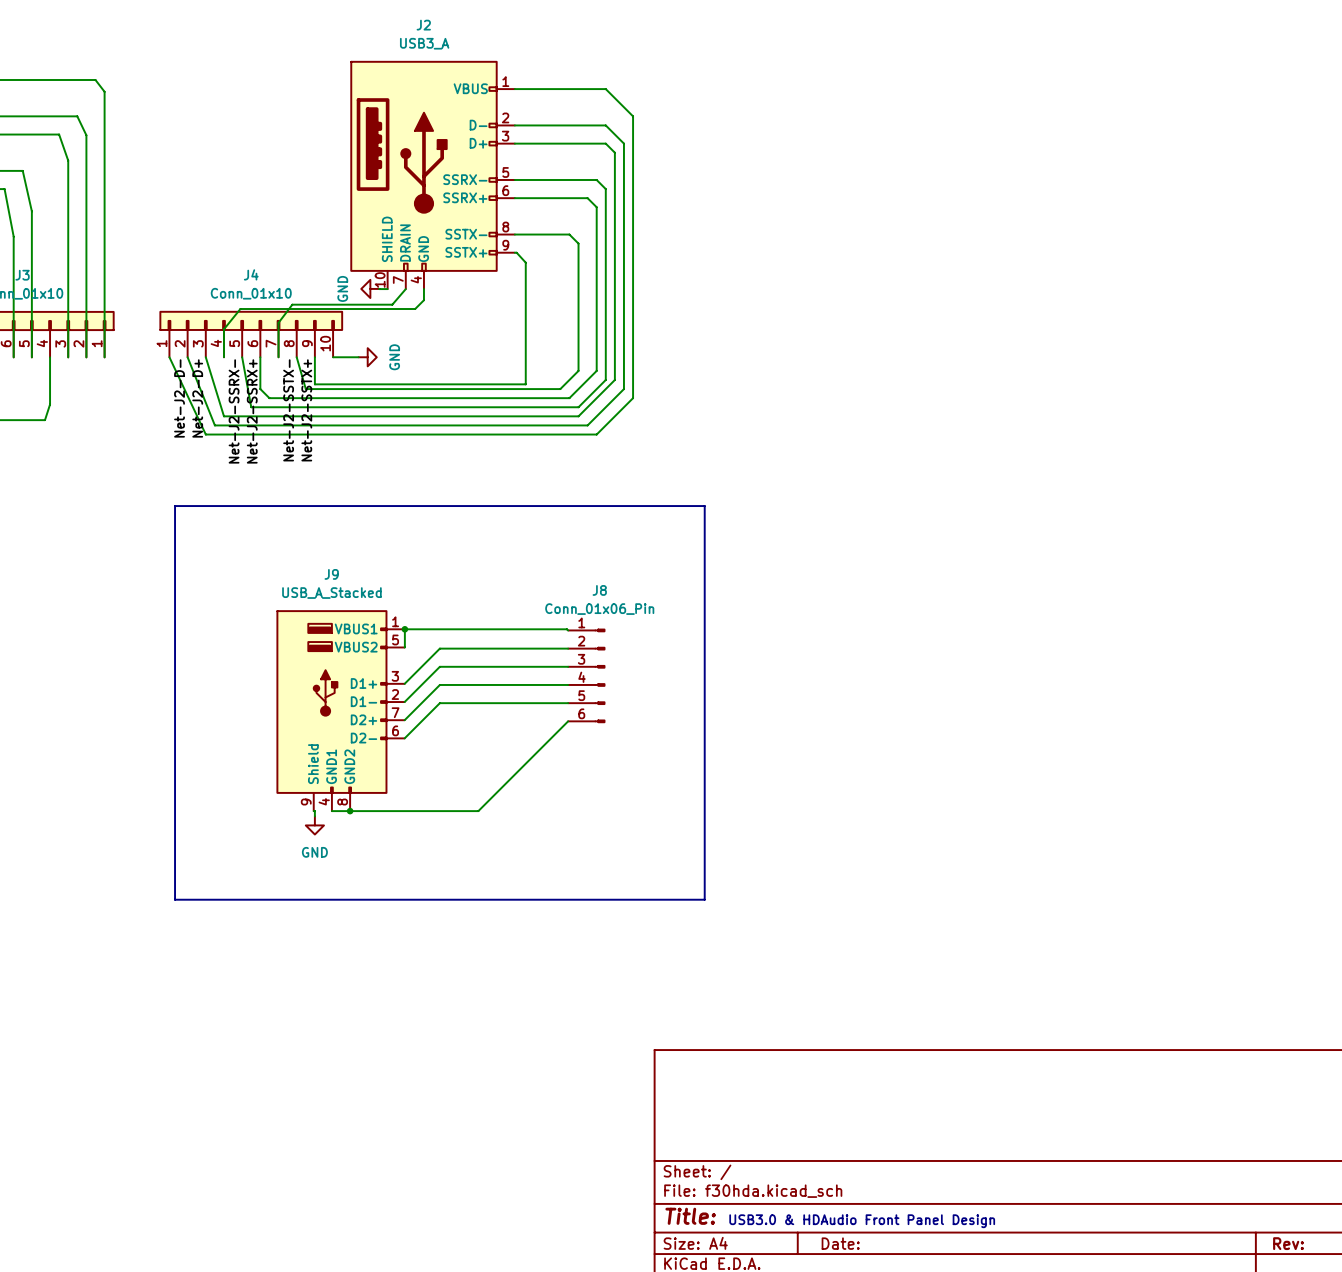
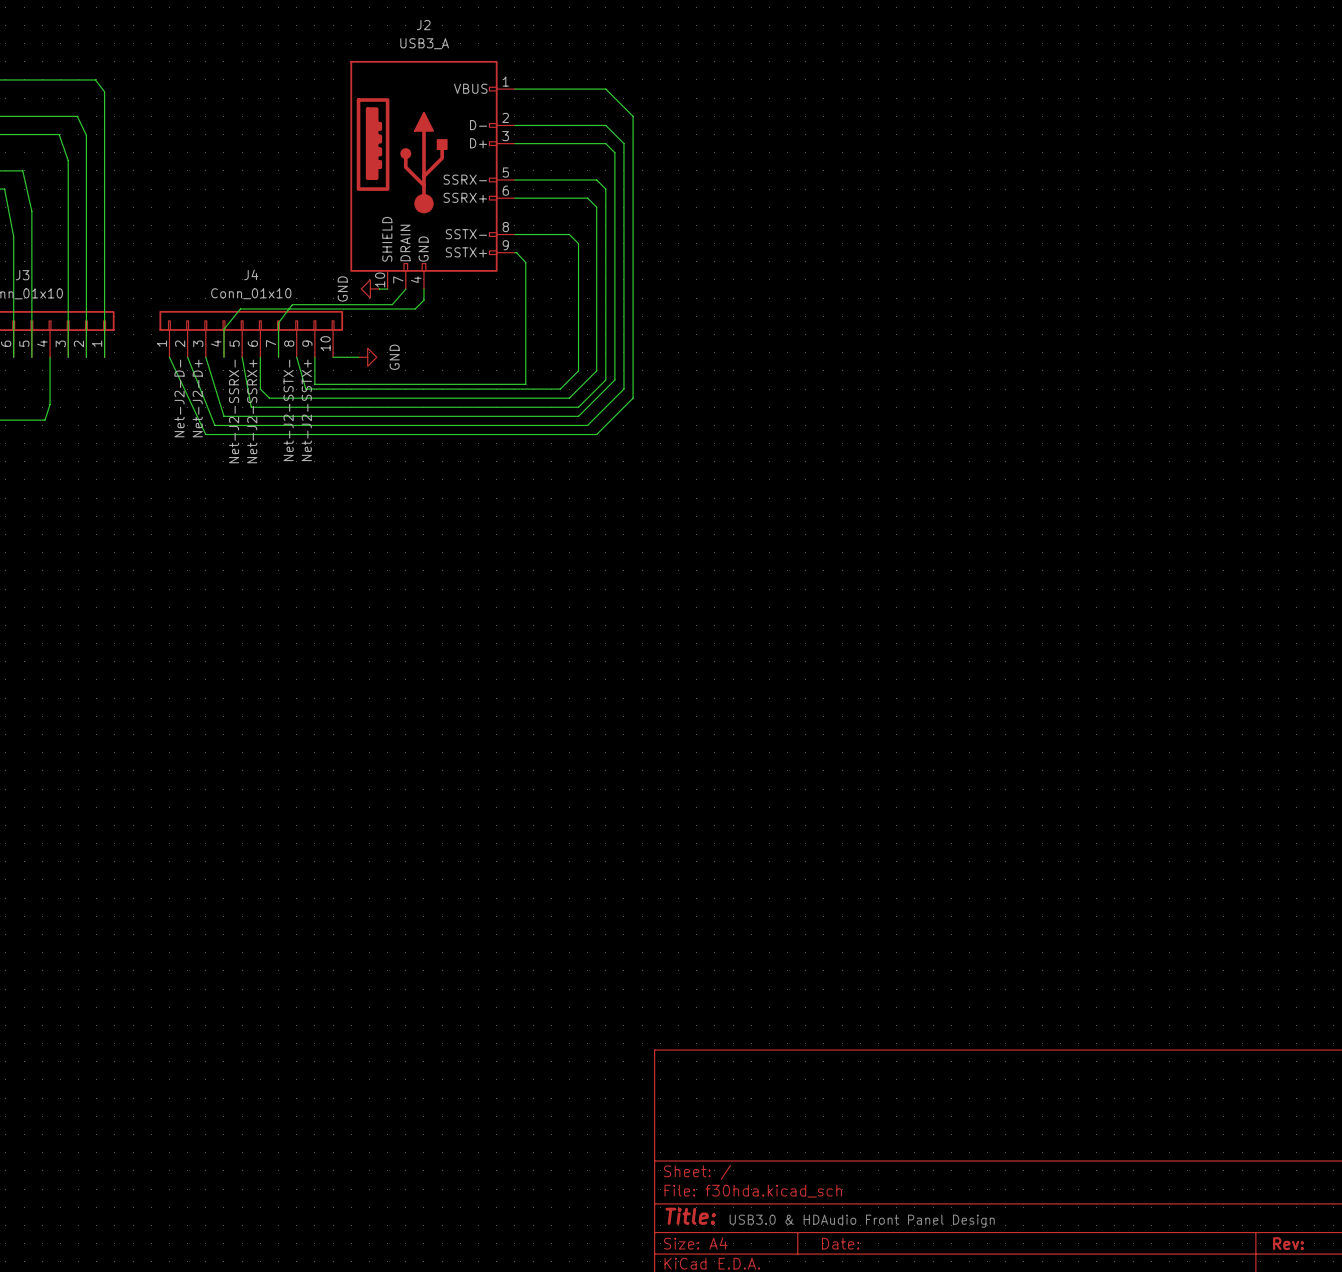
line: (175, 506) (704, 506) (704, 899) (175, 899) (175, 506) -> none
wire: (404, 629) (568, 630) -> none
wire: (404, 629) (404, 647) -> none
junction: (404, 629) -> none
wire: (568, 648) (439, 648) (404, 683) -> none
wire: (568, 666) (439, 666) (404, 702) -> none
J8: Conn_01x06_Pin (586, 675) -> none
wire: (568, 684) (439, 684) (404, 720) -> none
wire: (568, 703) (439, 703) (404, 738) -> none
J9: USB_A_Stacked (340, 710) -> none
wire: (568, 721) (478, 811) (331, 811) -> none
wire: (313, 811) (314, 816) -> none
junction: (350, 811) -> none
power symbol: GND (314, 825) -> none

